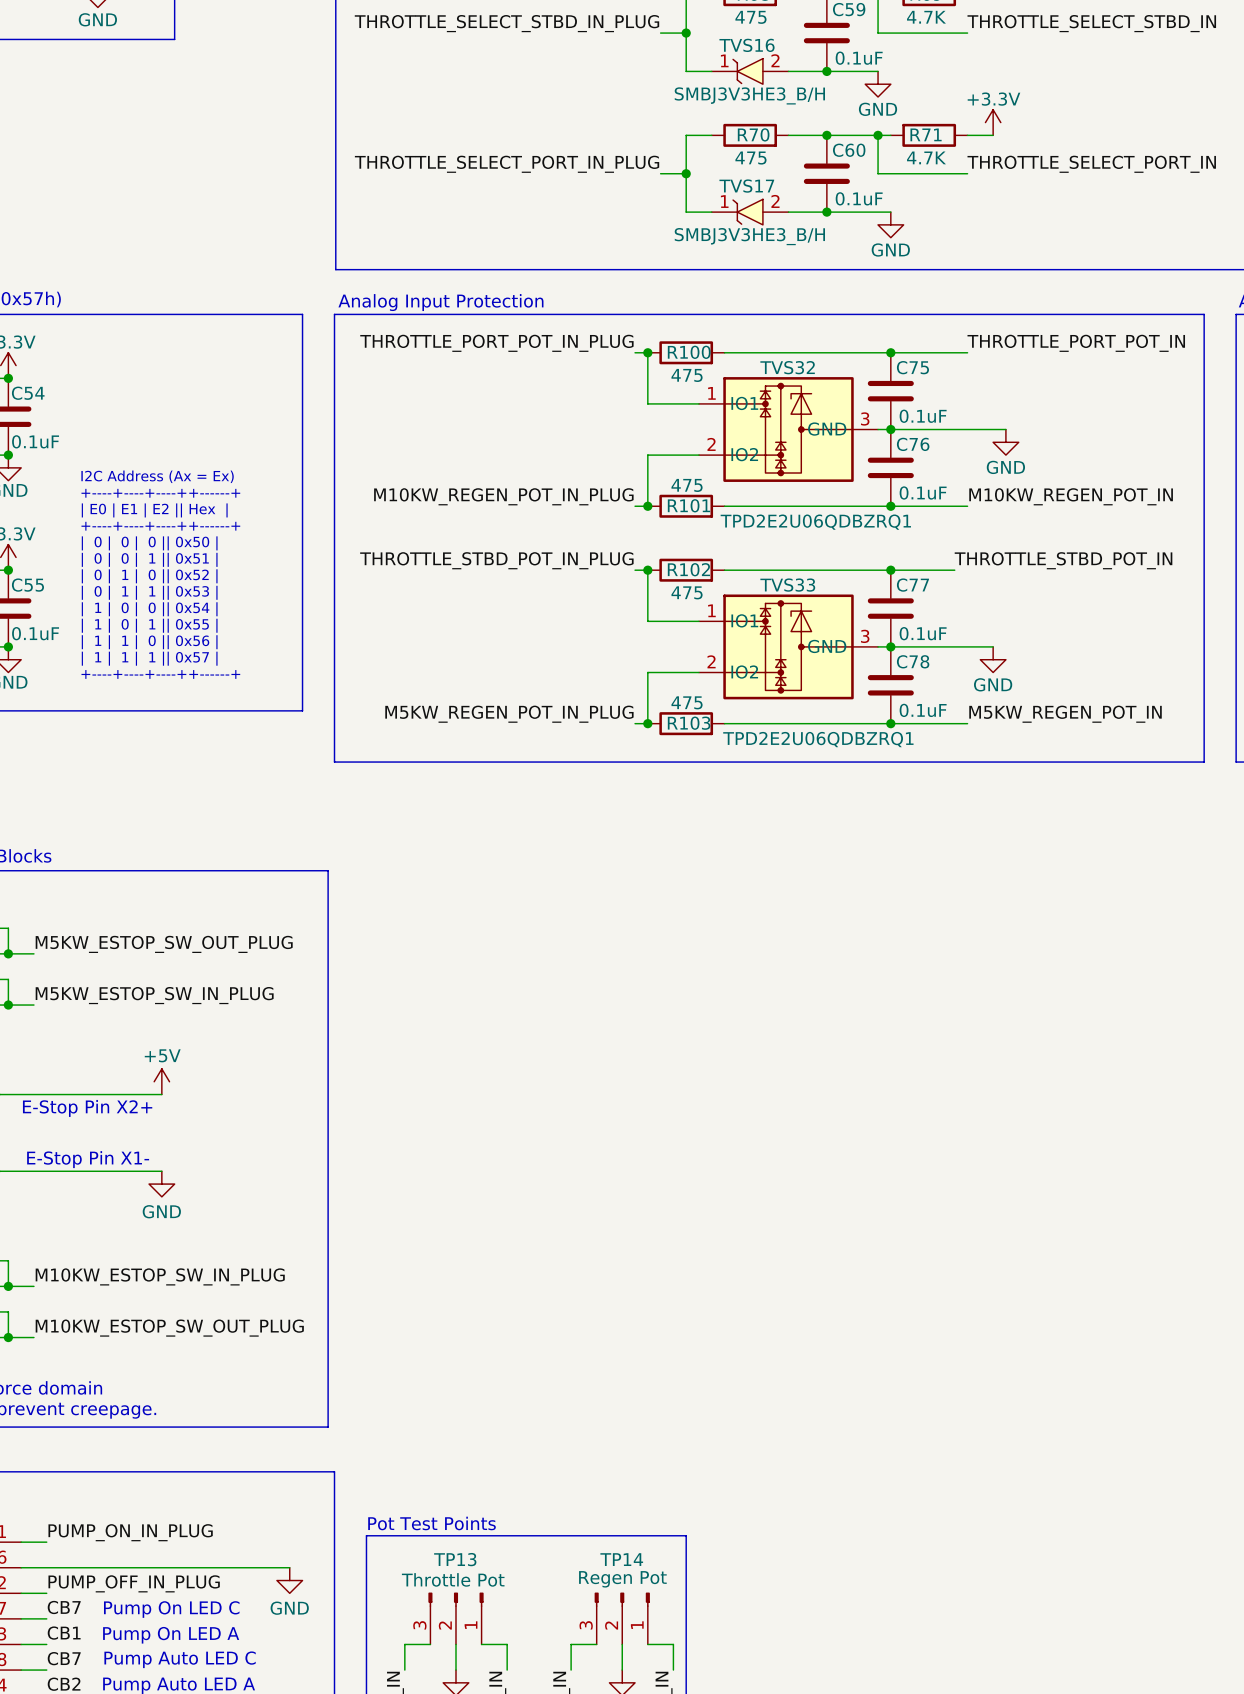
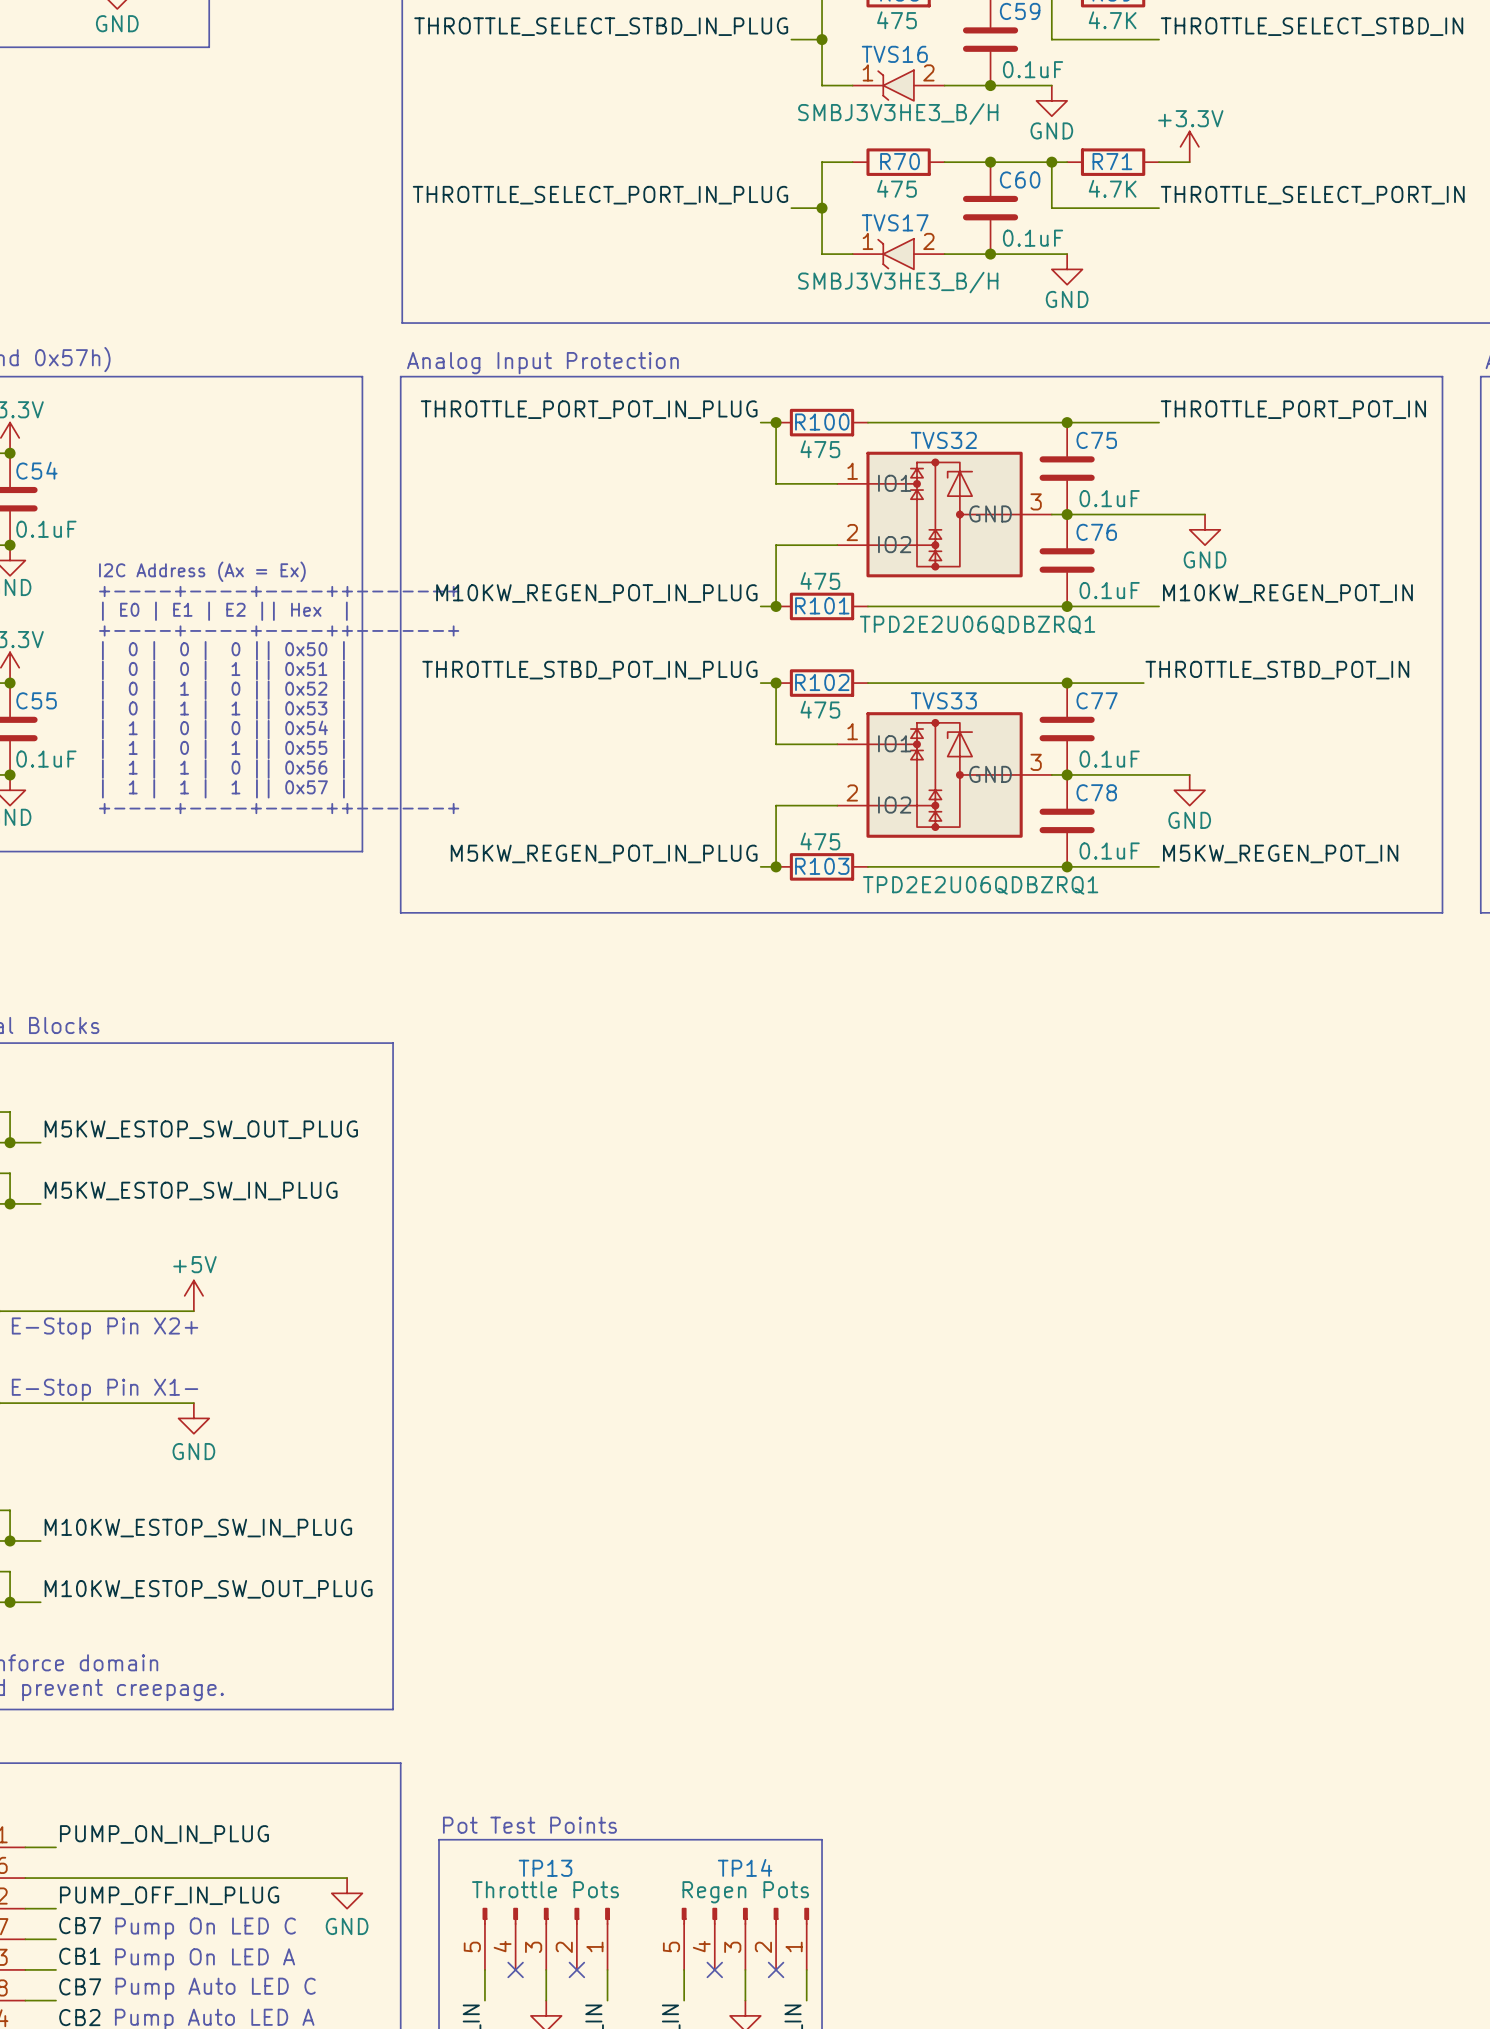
TP13 value: Throttle Pot (453, 1579) -> Throttle Pots (545, 1889)
TP14 value: Regen Pot (622, 1579) -> Regen Pots (745, 1892)
TP13 symbol: [428, 1592, 484, 1645] -> [482, 1907, 610, 1970]
TP14 symbol: [594, 1592, 650, 1645] -> [681, 1907, 810, 1970]
wire: (404, 1644) (430, 1644) -> none
no-connect mark: none -> (515, 1969)
wire: (481, 1644) (507, 1644) -> none
no-connect mark: none -> (576, 1969)
wire: (571, 1644) (596, 1644) -> none
no-connect mark: none -> (714, 1969)
wire: (647, 1644) (673, 1644) -> none
no-connect mark: none -> (776, 1969)

